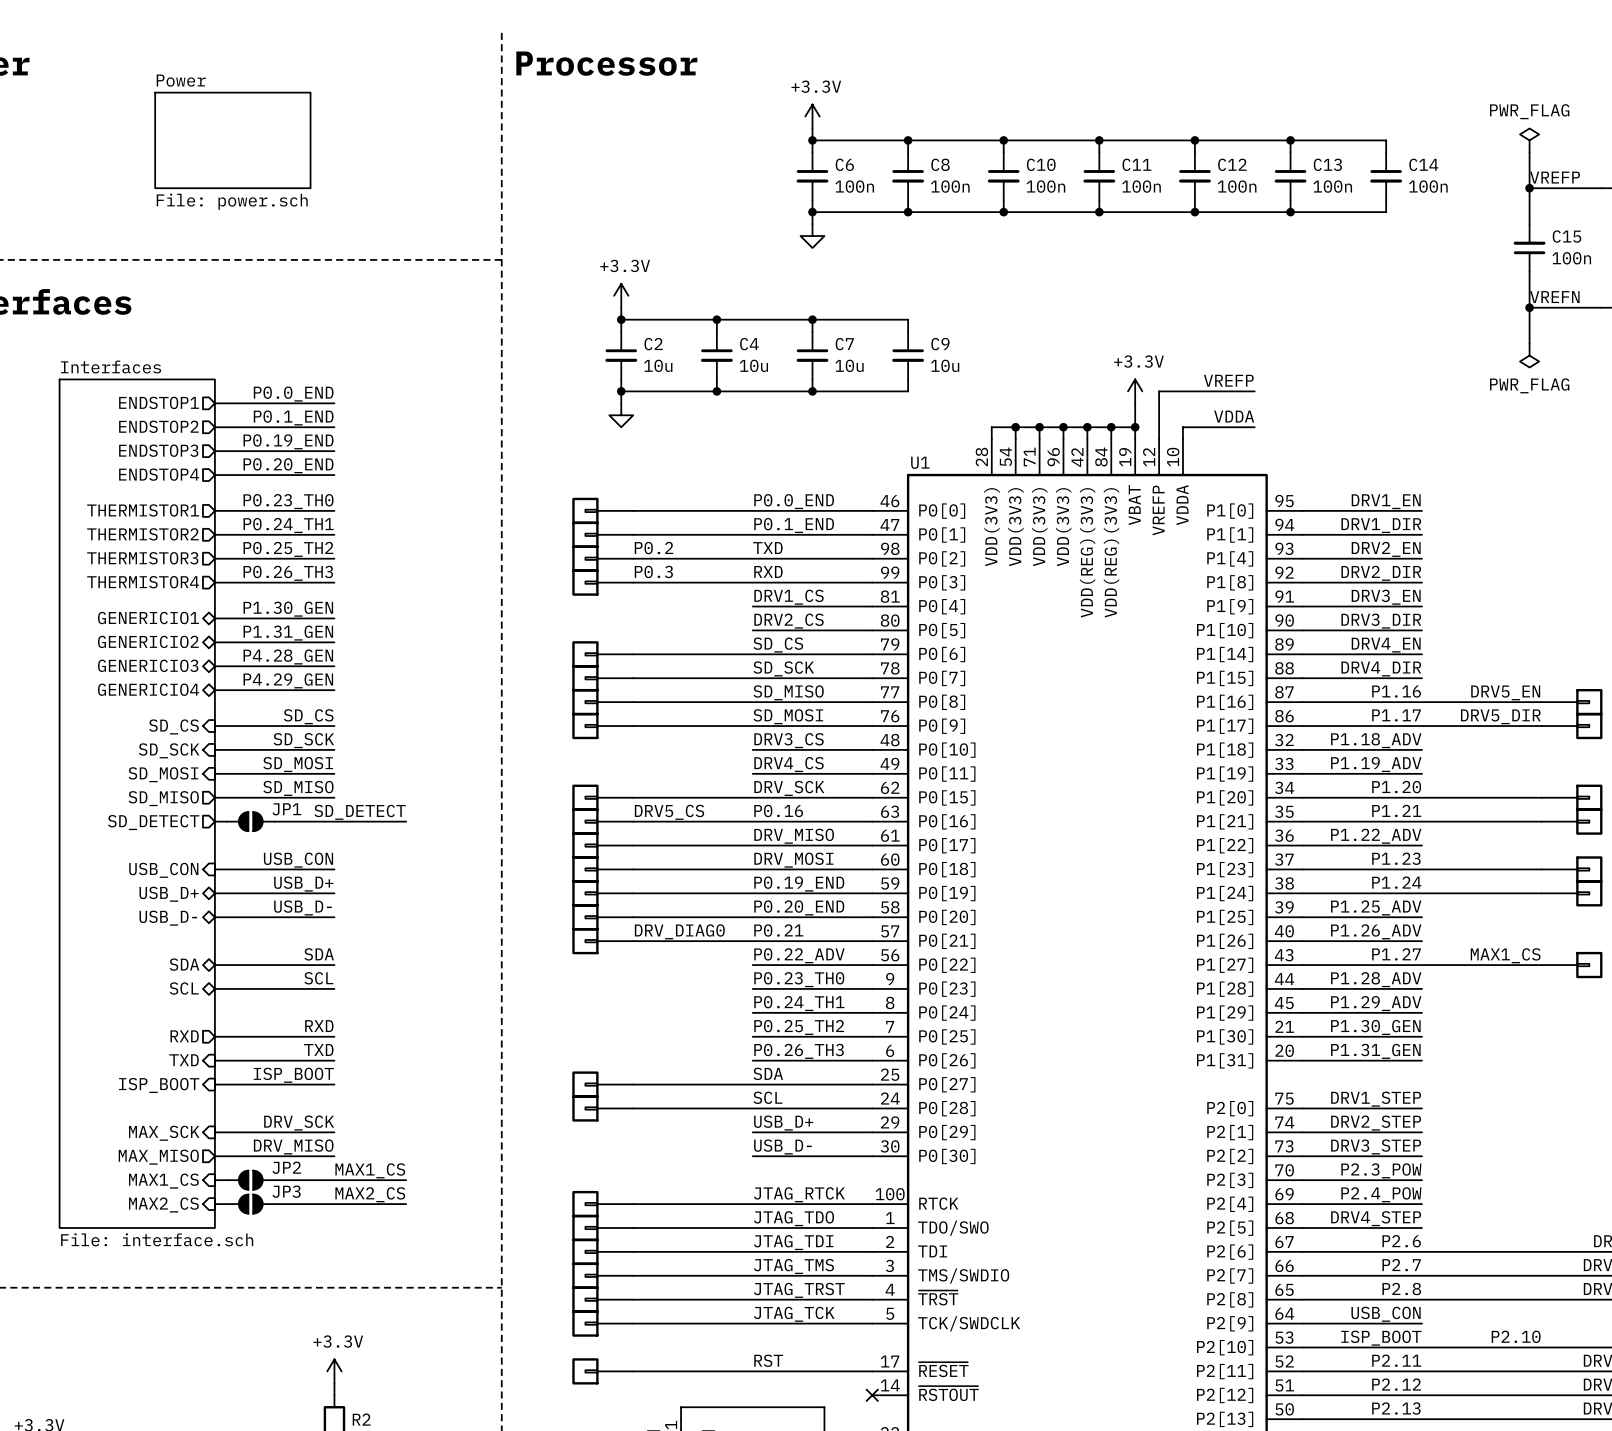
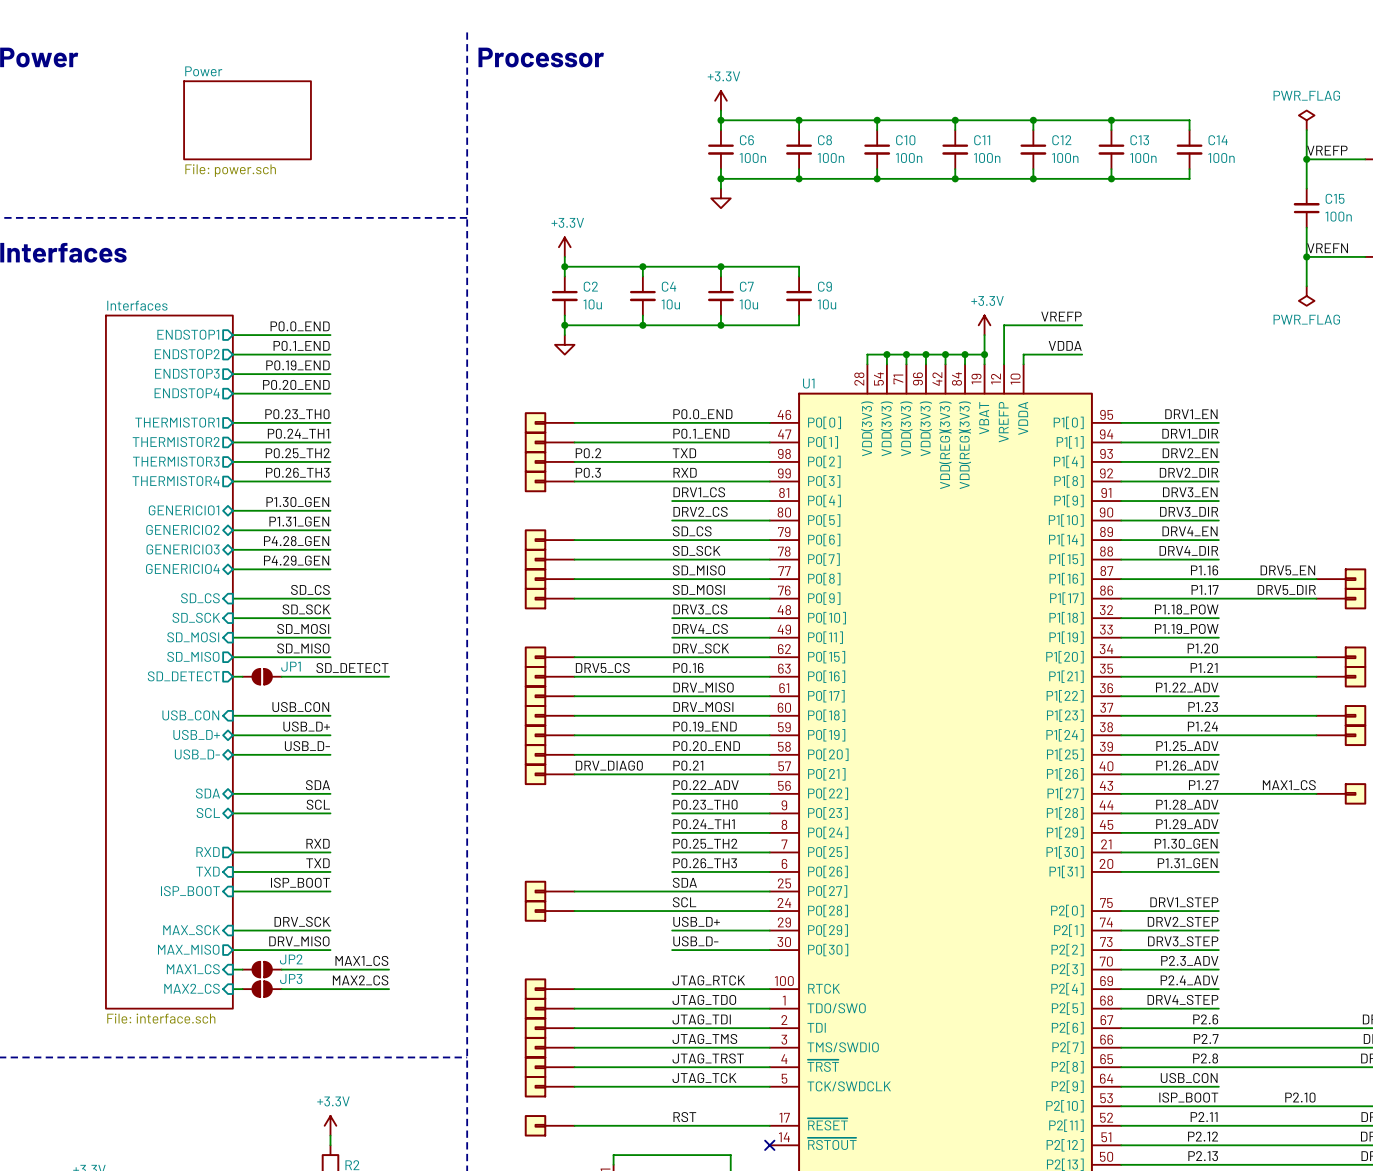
label: P1.18_ADV (1376, 740) -> P1.18_POW (1186, 609)
label: P1.19_ADV (1376, 764) -> P1.19_POW (1186, 628)
label: P2.3_POW (1381, 1170) -> P2.3_ADV (1189, 960)
label: P2.4_POW (1381, 1194) -> P2.4_ADV (1189, 980)

